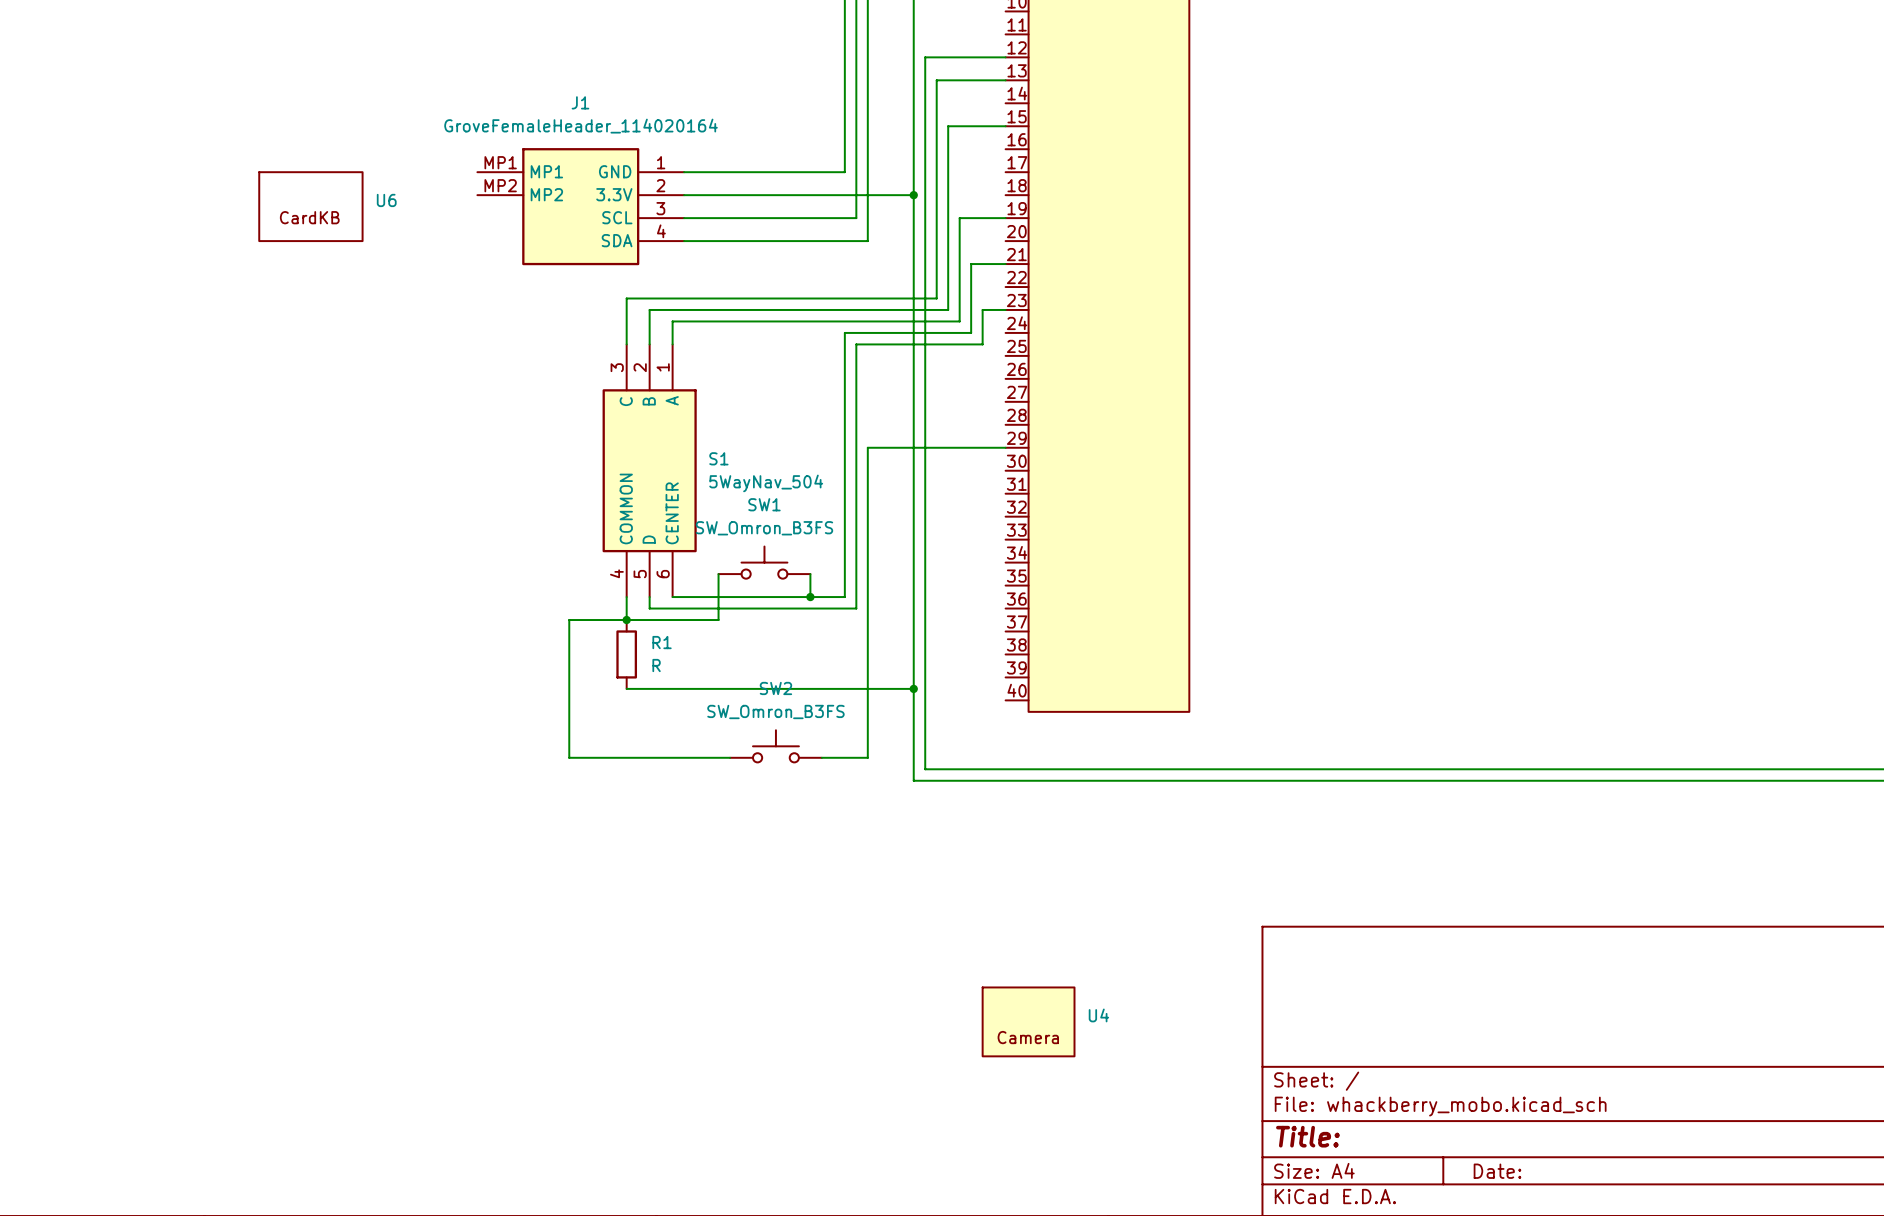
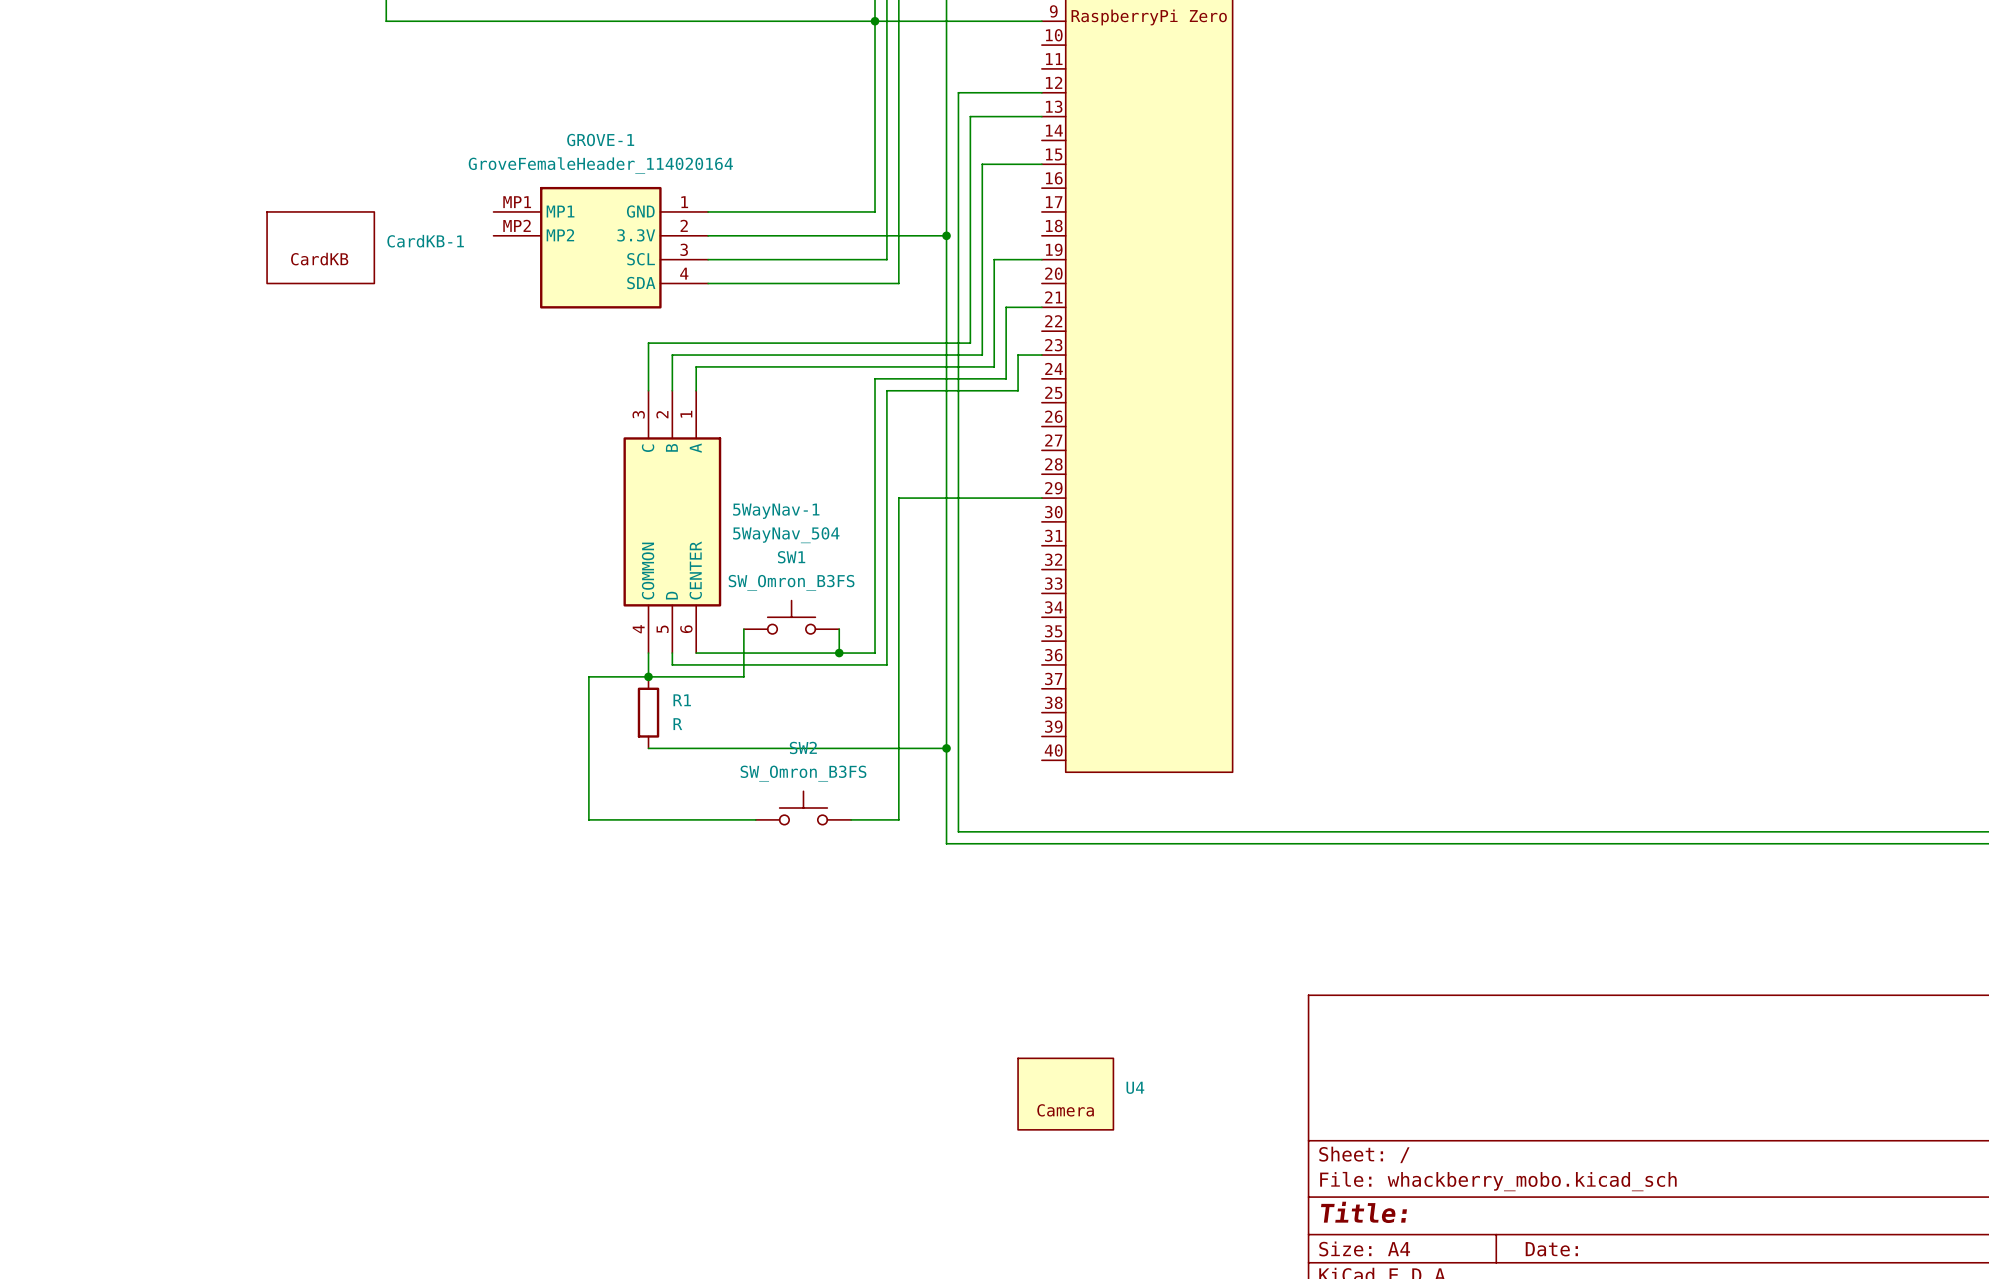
J1 name: J1 (580, 102) -> GROVE-1 (600, 140)
U6 name: U6 (386, 200) -> CardKB-1 (425, 241)
S1 name: S1 (718, 458) -> 5WayNav-1 (776, 511)

